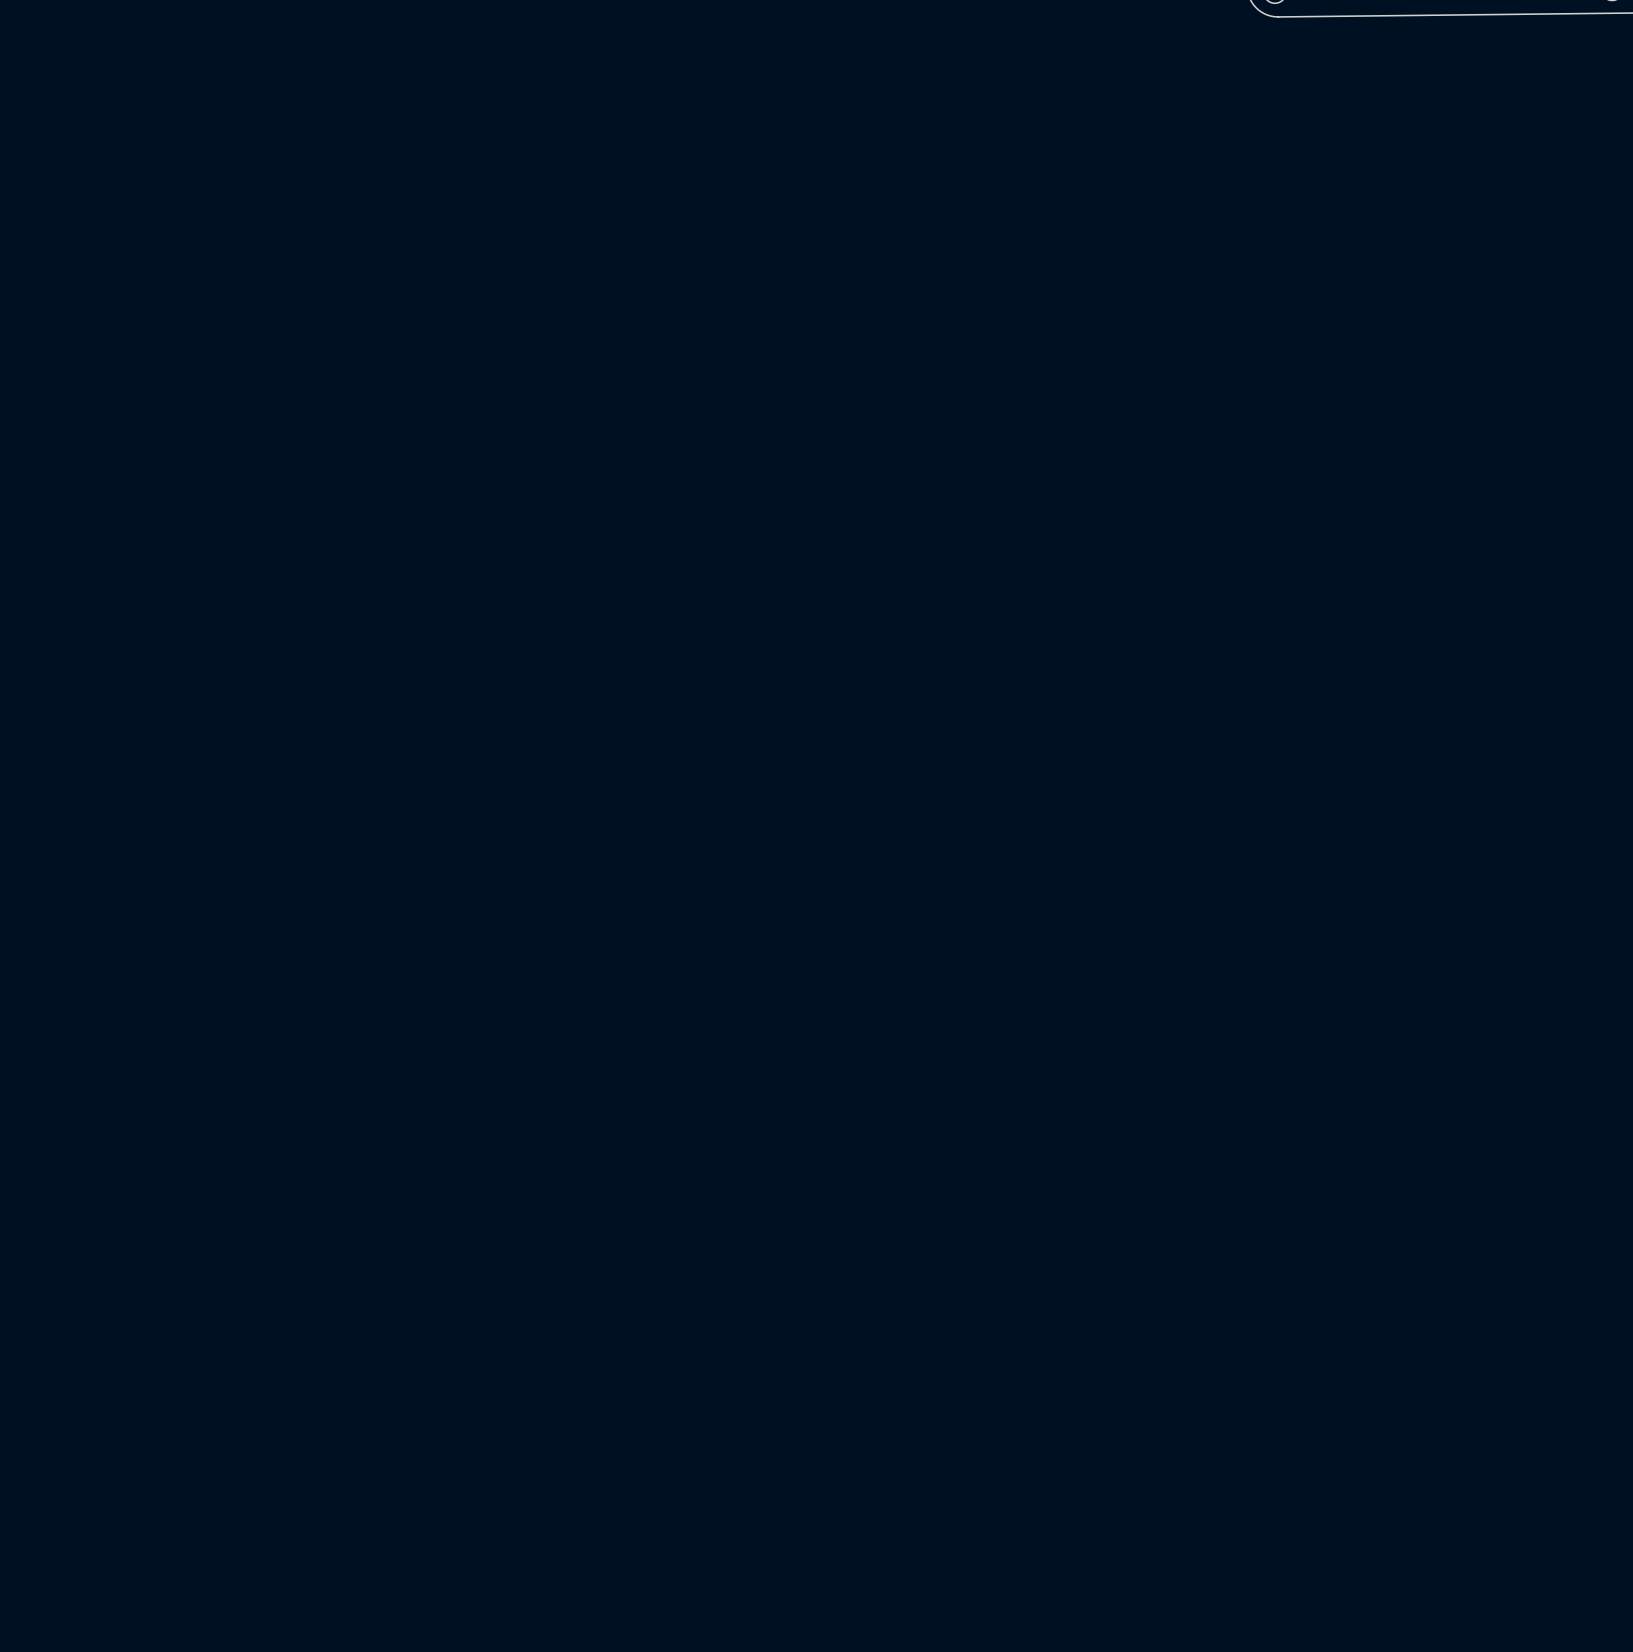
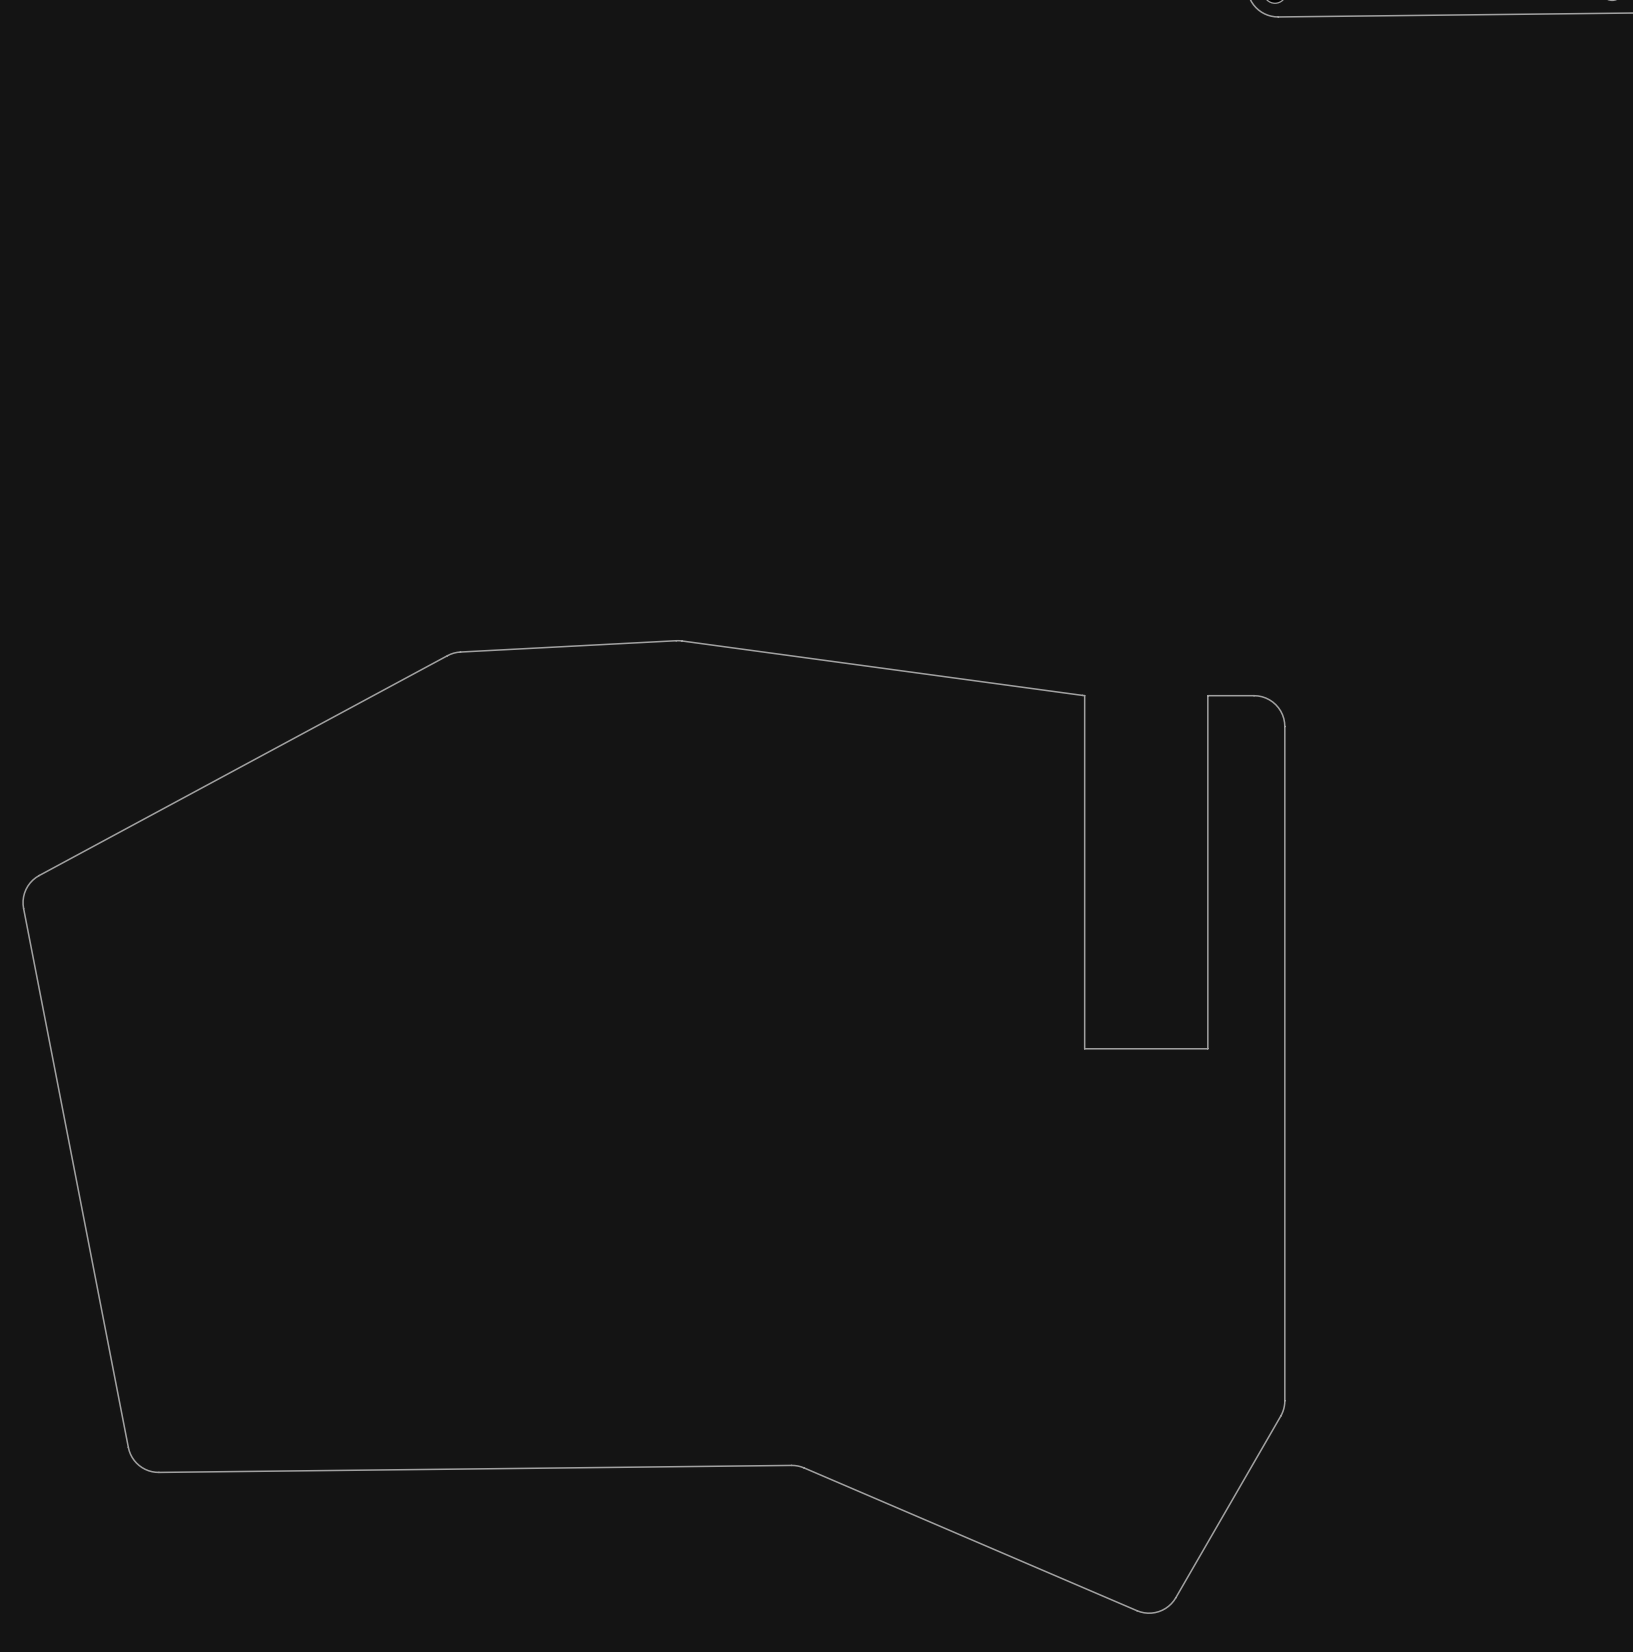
board edge: none -> (676, 640) (460, 652) (450, 654) (39, 875) (27, 886) (23, 896) (23, 908) (130, 1454) (142, 1467) (158, 1472) (797, 1466) (1136, 1610) (1151, 1613) (1162, 1610) (1175, 1597) (1280, 1416) (1284, 1403) (1284, 726) (1280, 711) (1272, 702) (1262, 696) (1207, 695) (1207, 1048) (1084, 1048) (1084, 695) (676, 640)

